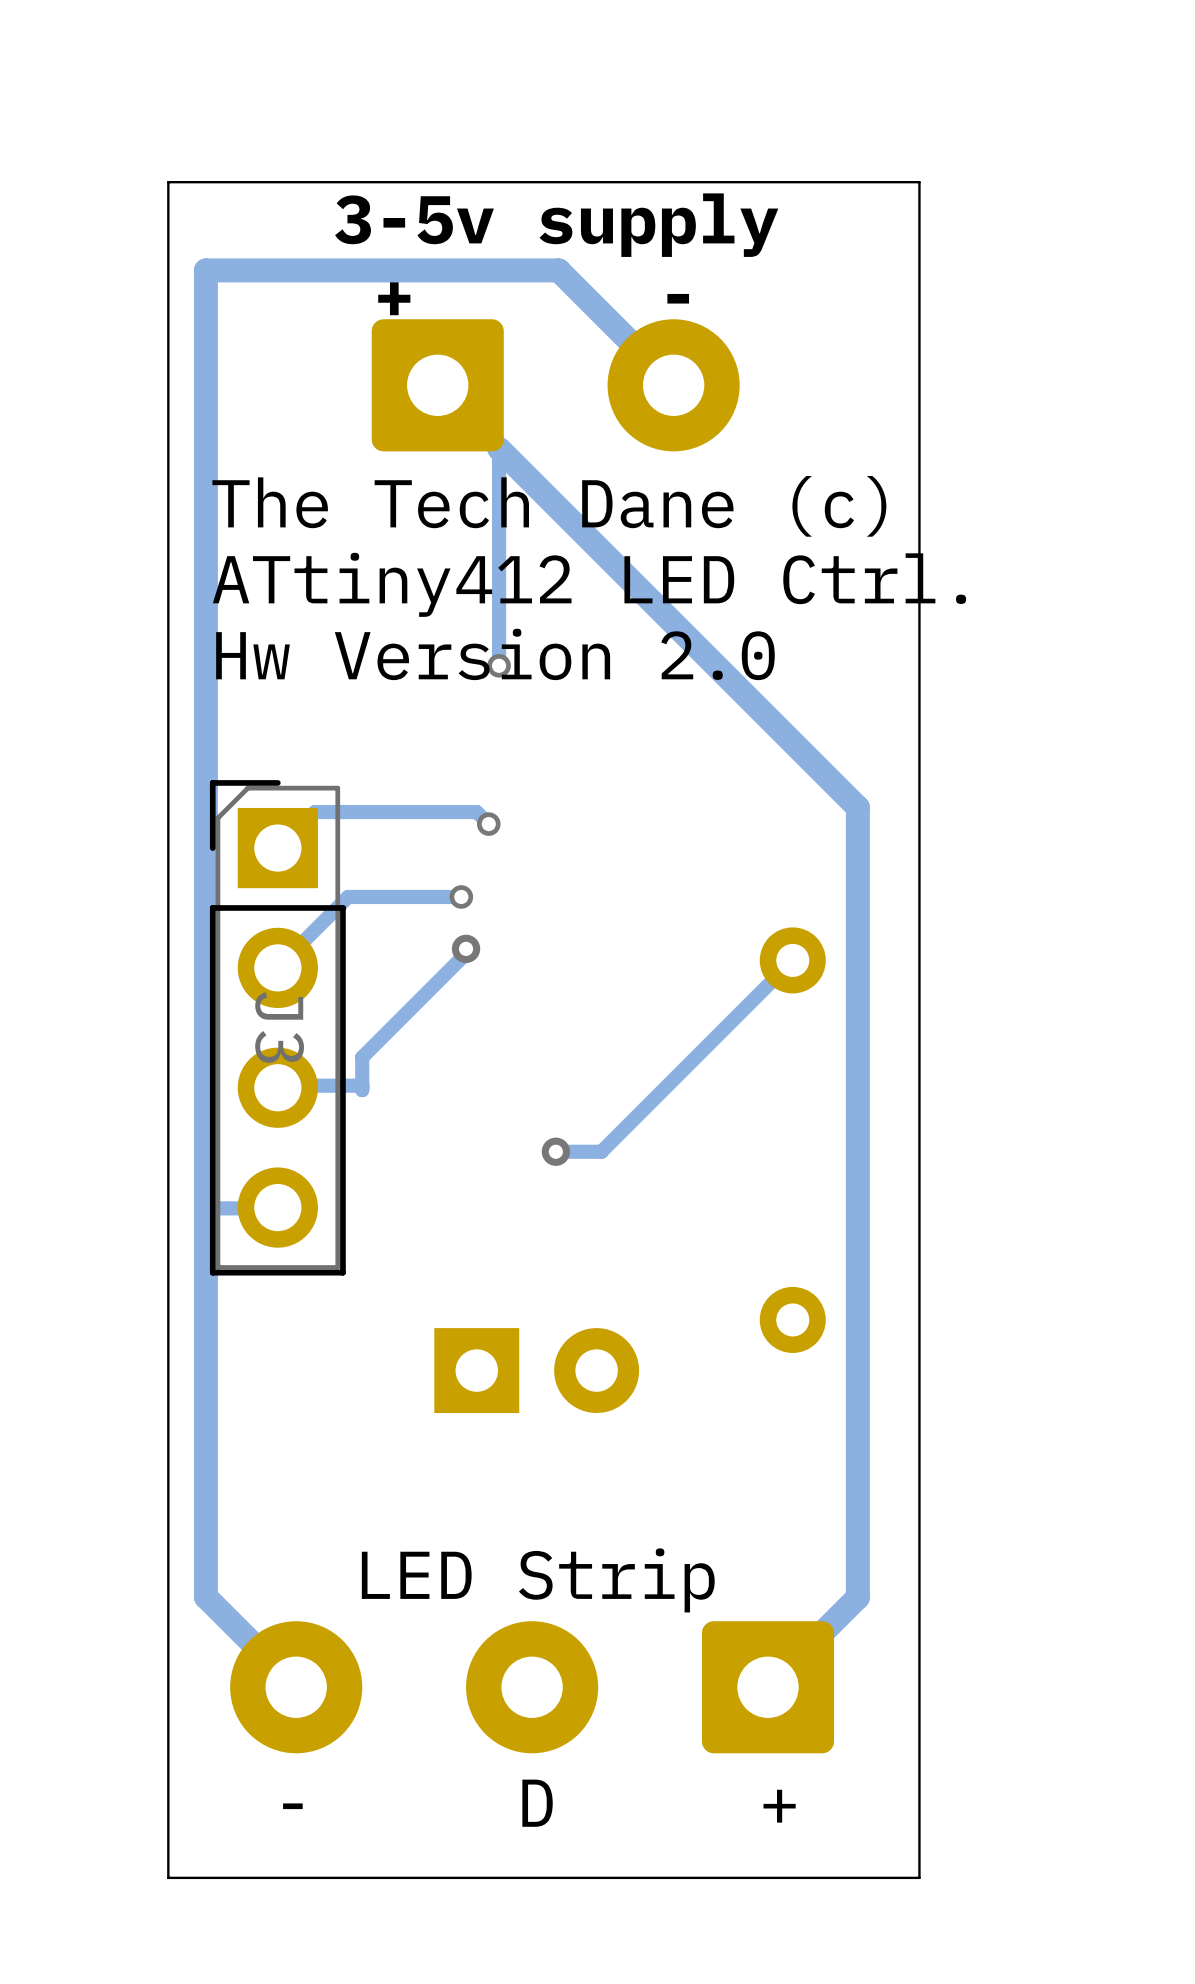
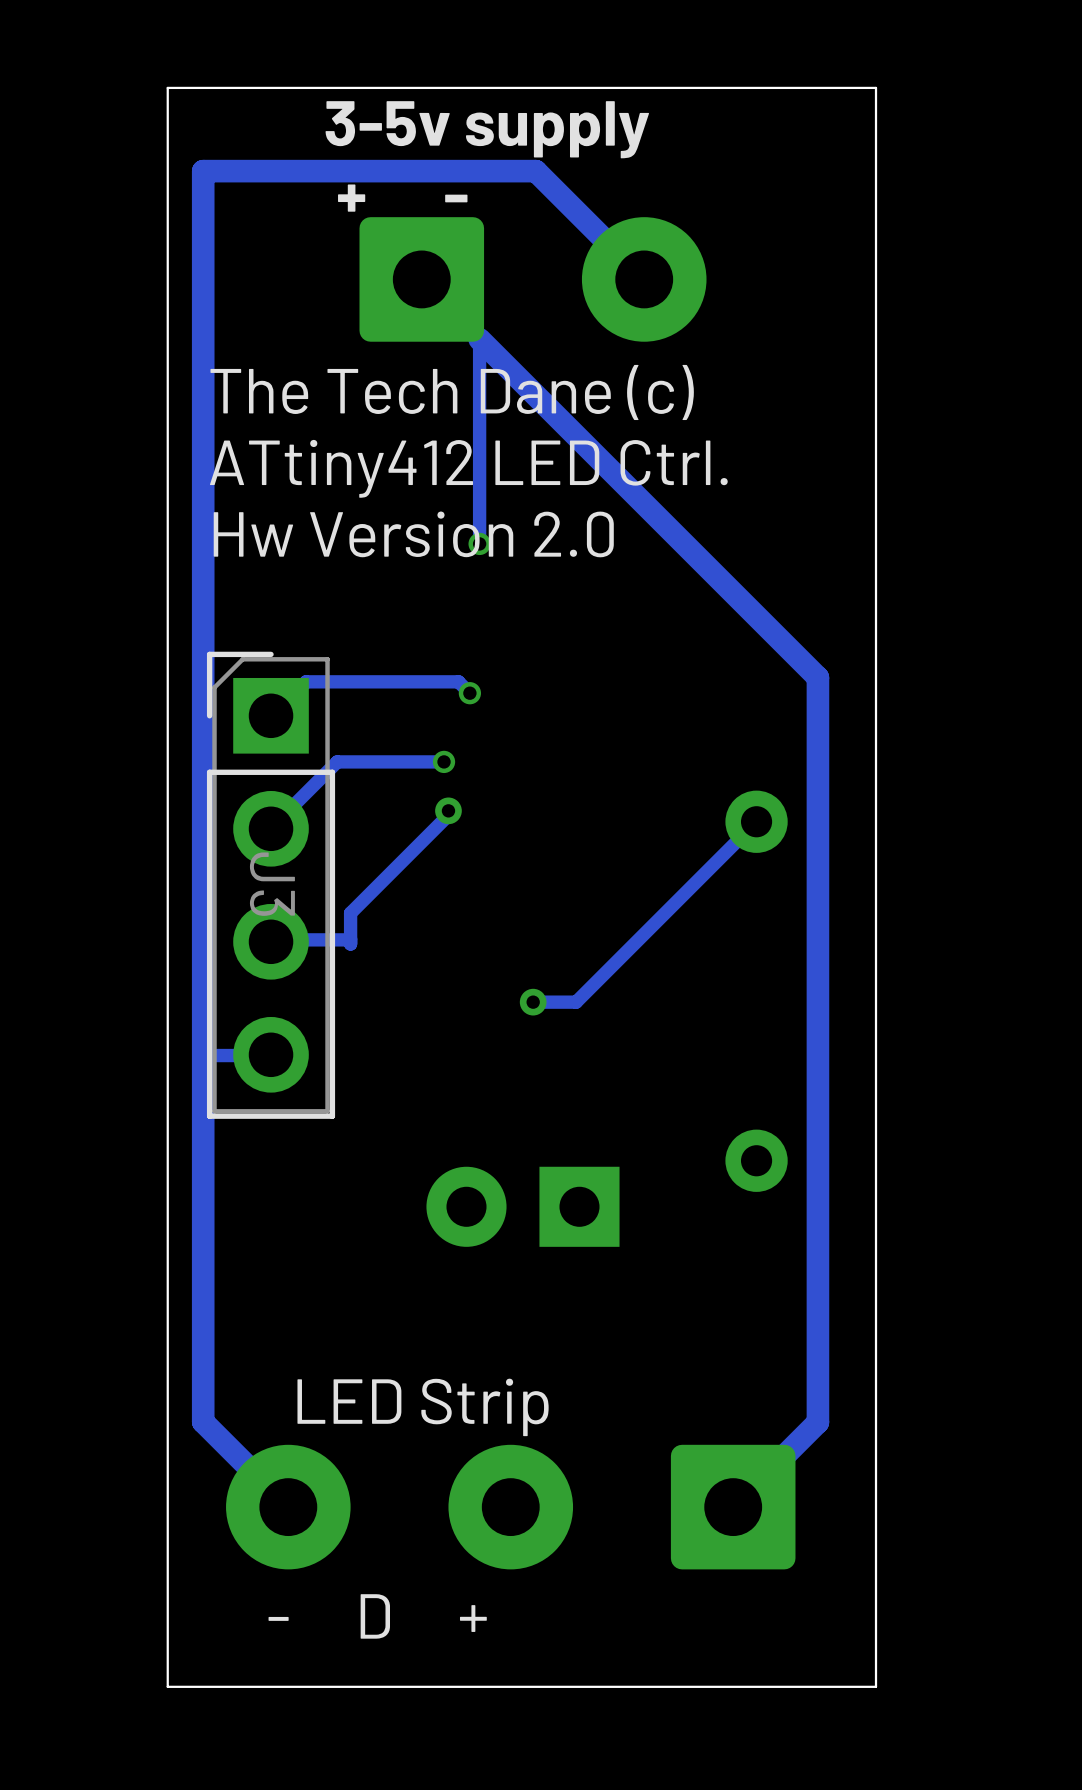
part rotation: 0° (536, 1370) -> 180° (522, 1206)

